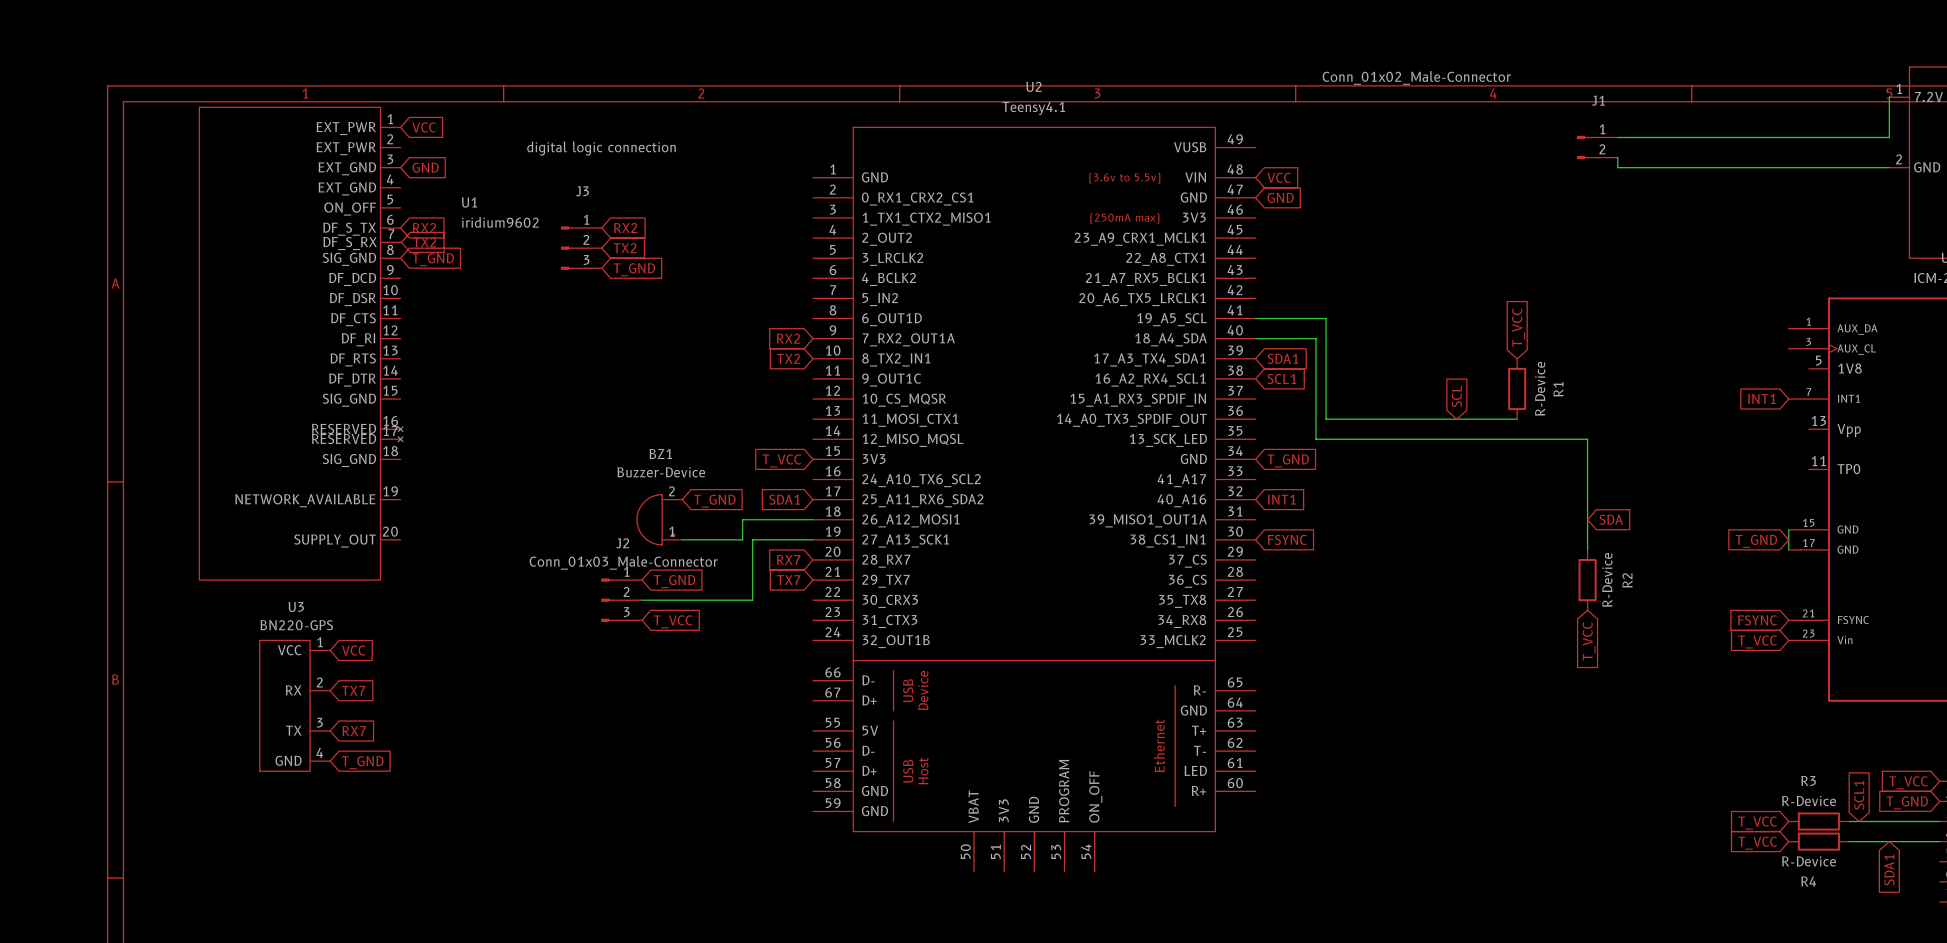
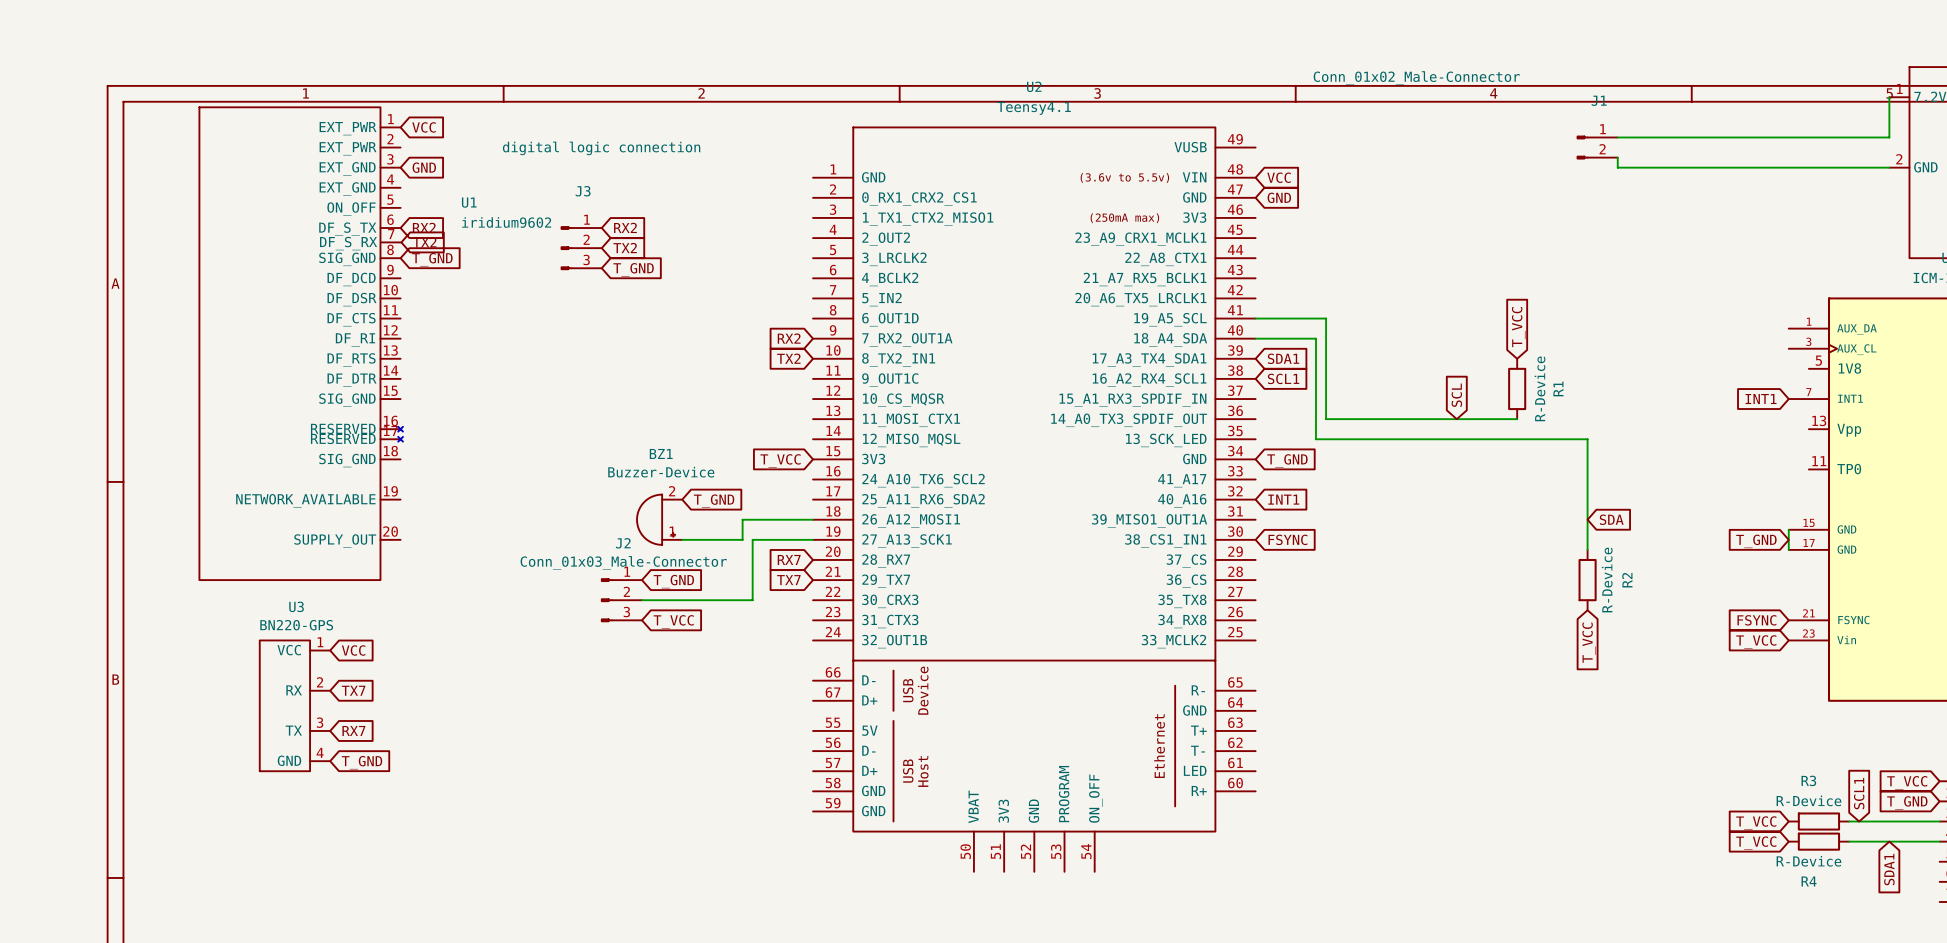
global label: SDA1 (784, 499) -> none

